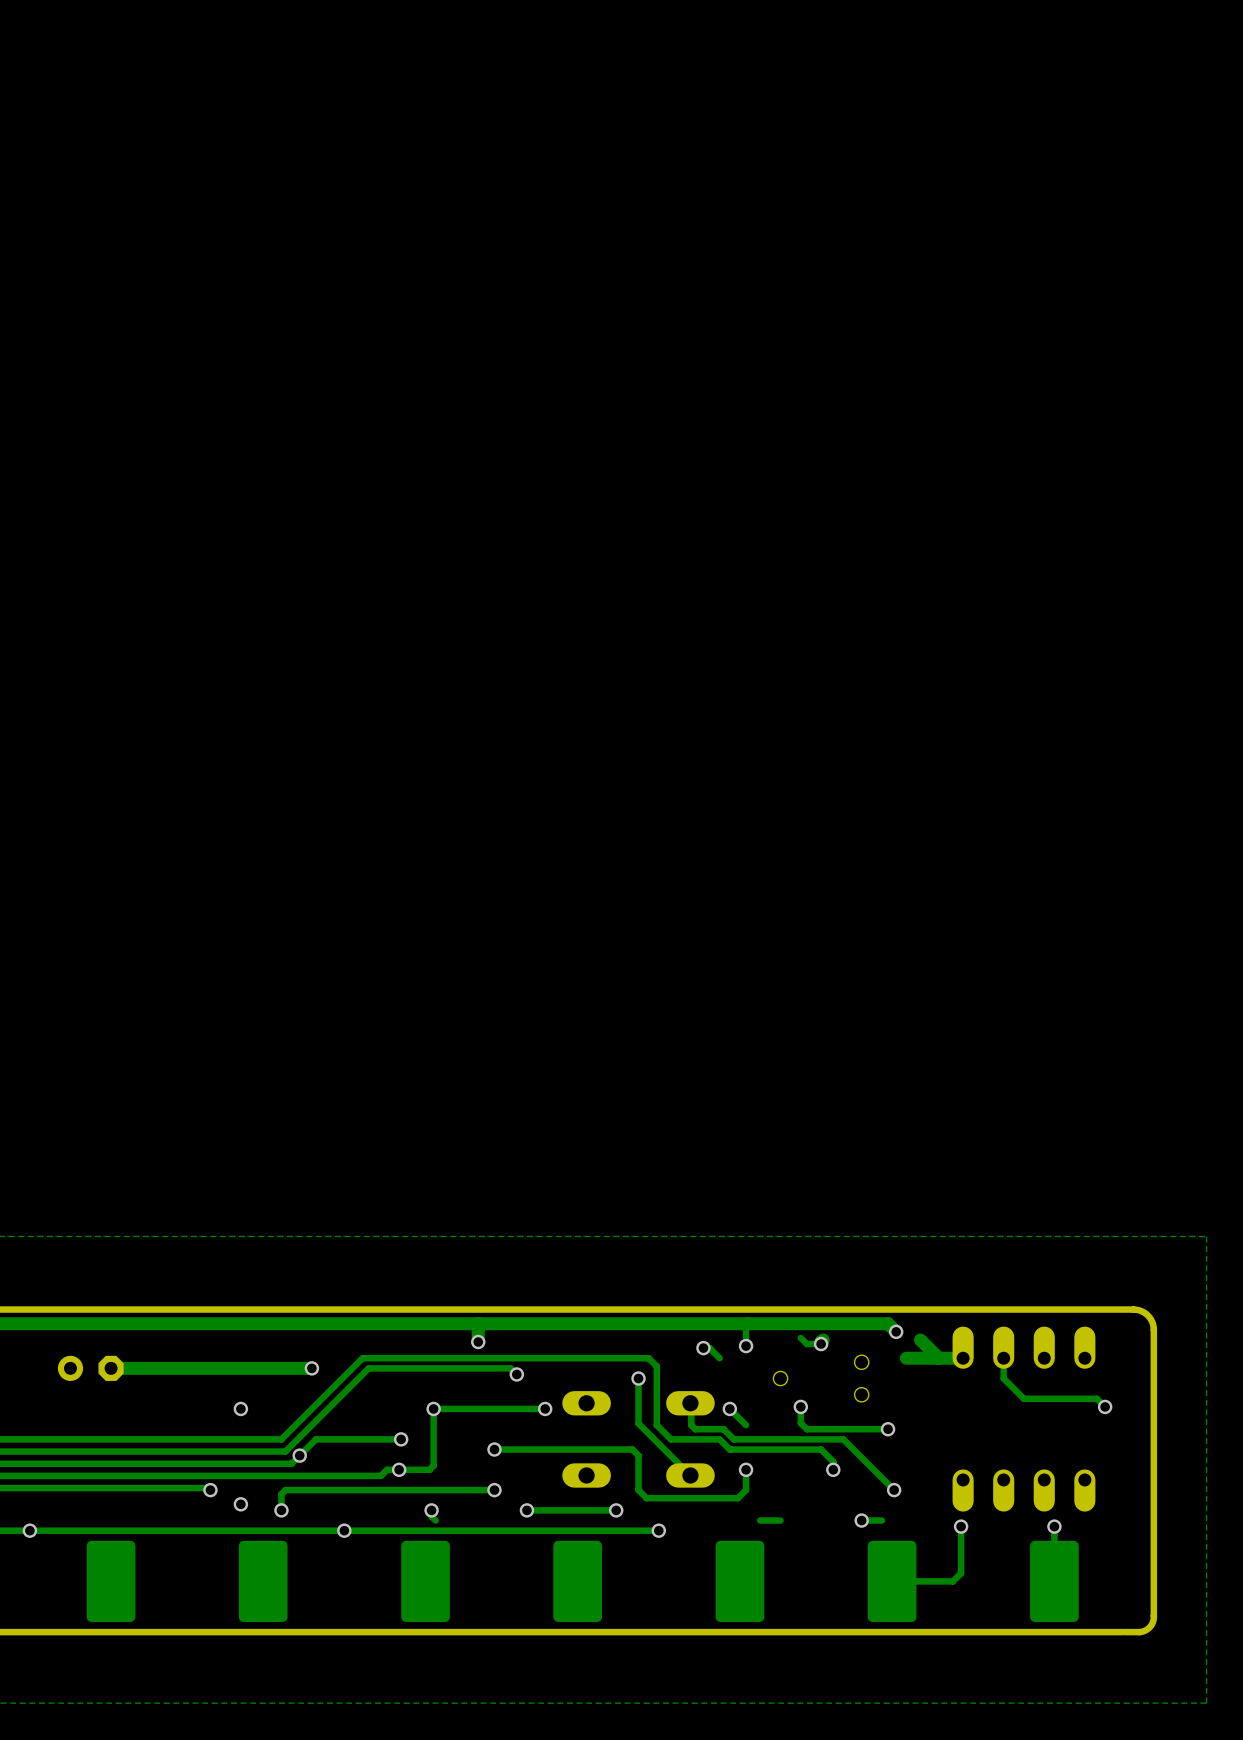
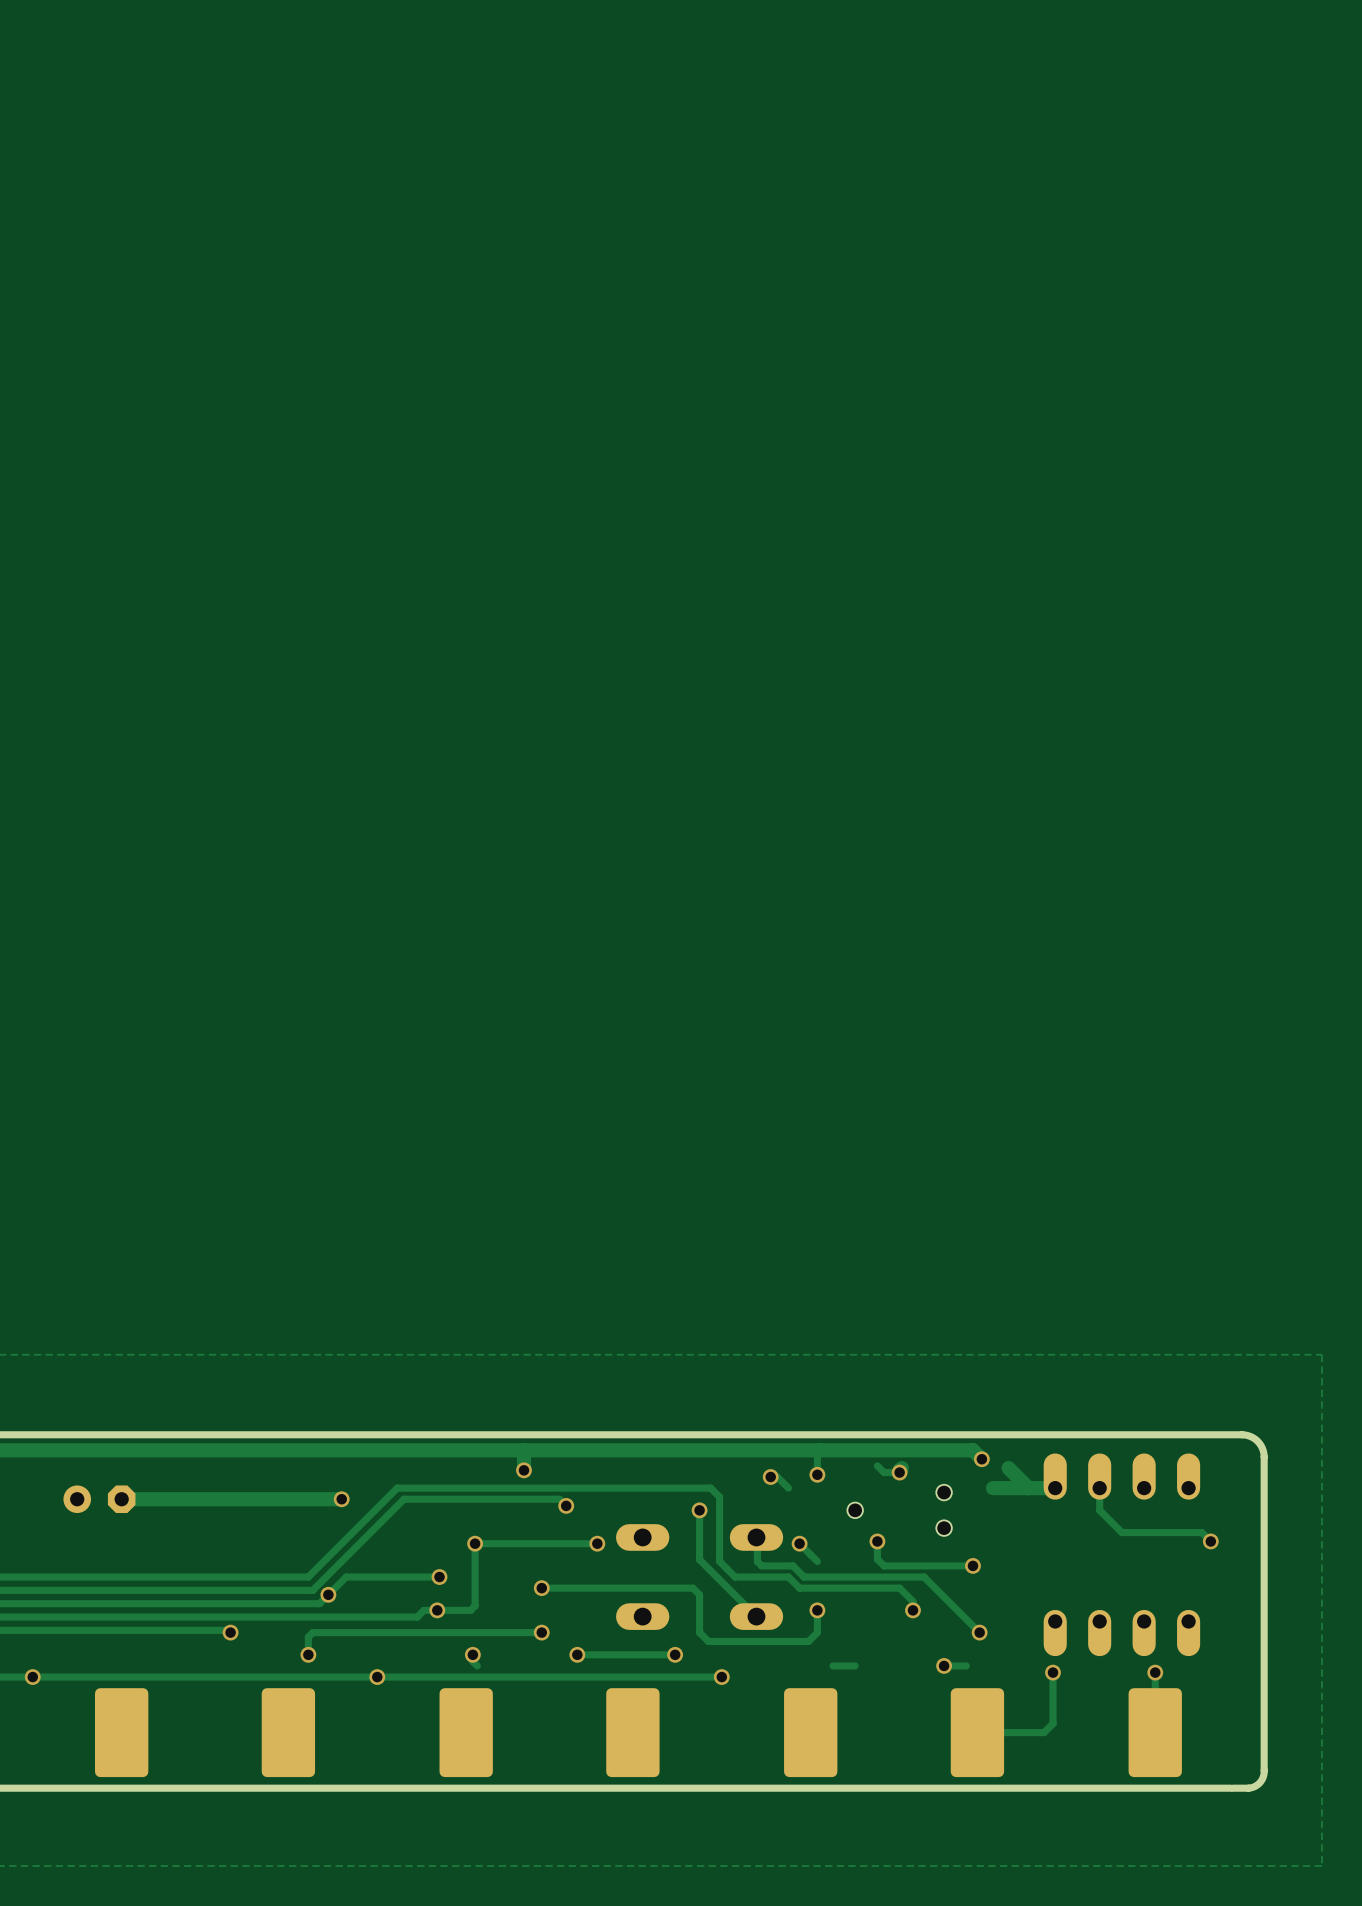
via: (240, 1408) -> none
via: (240, 1504) -> none

